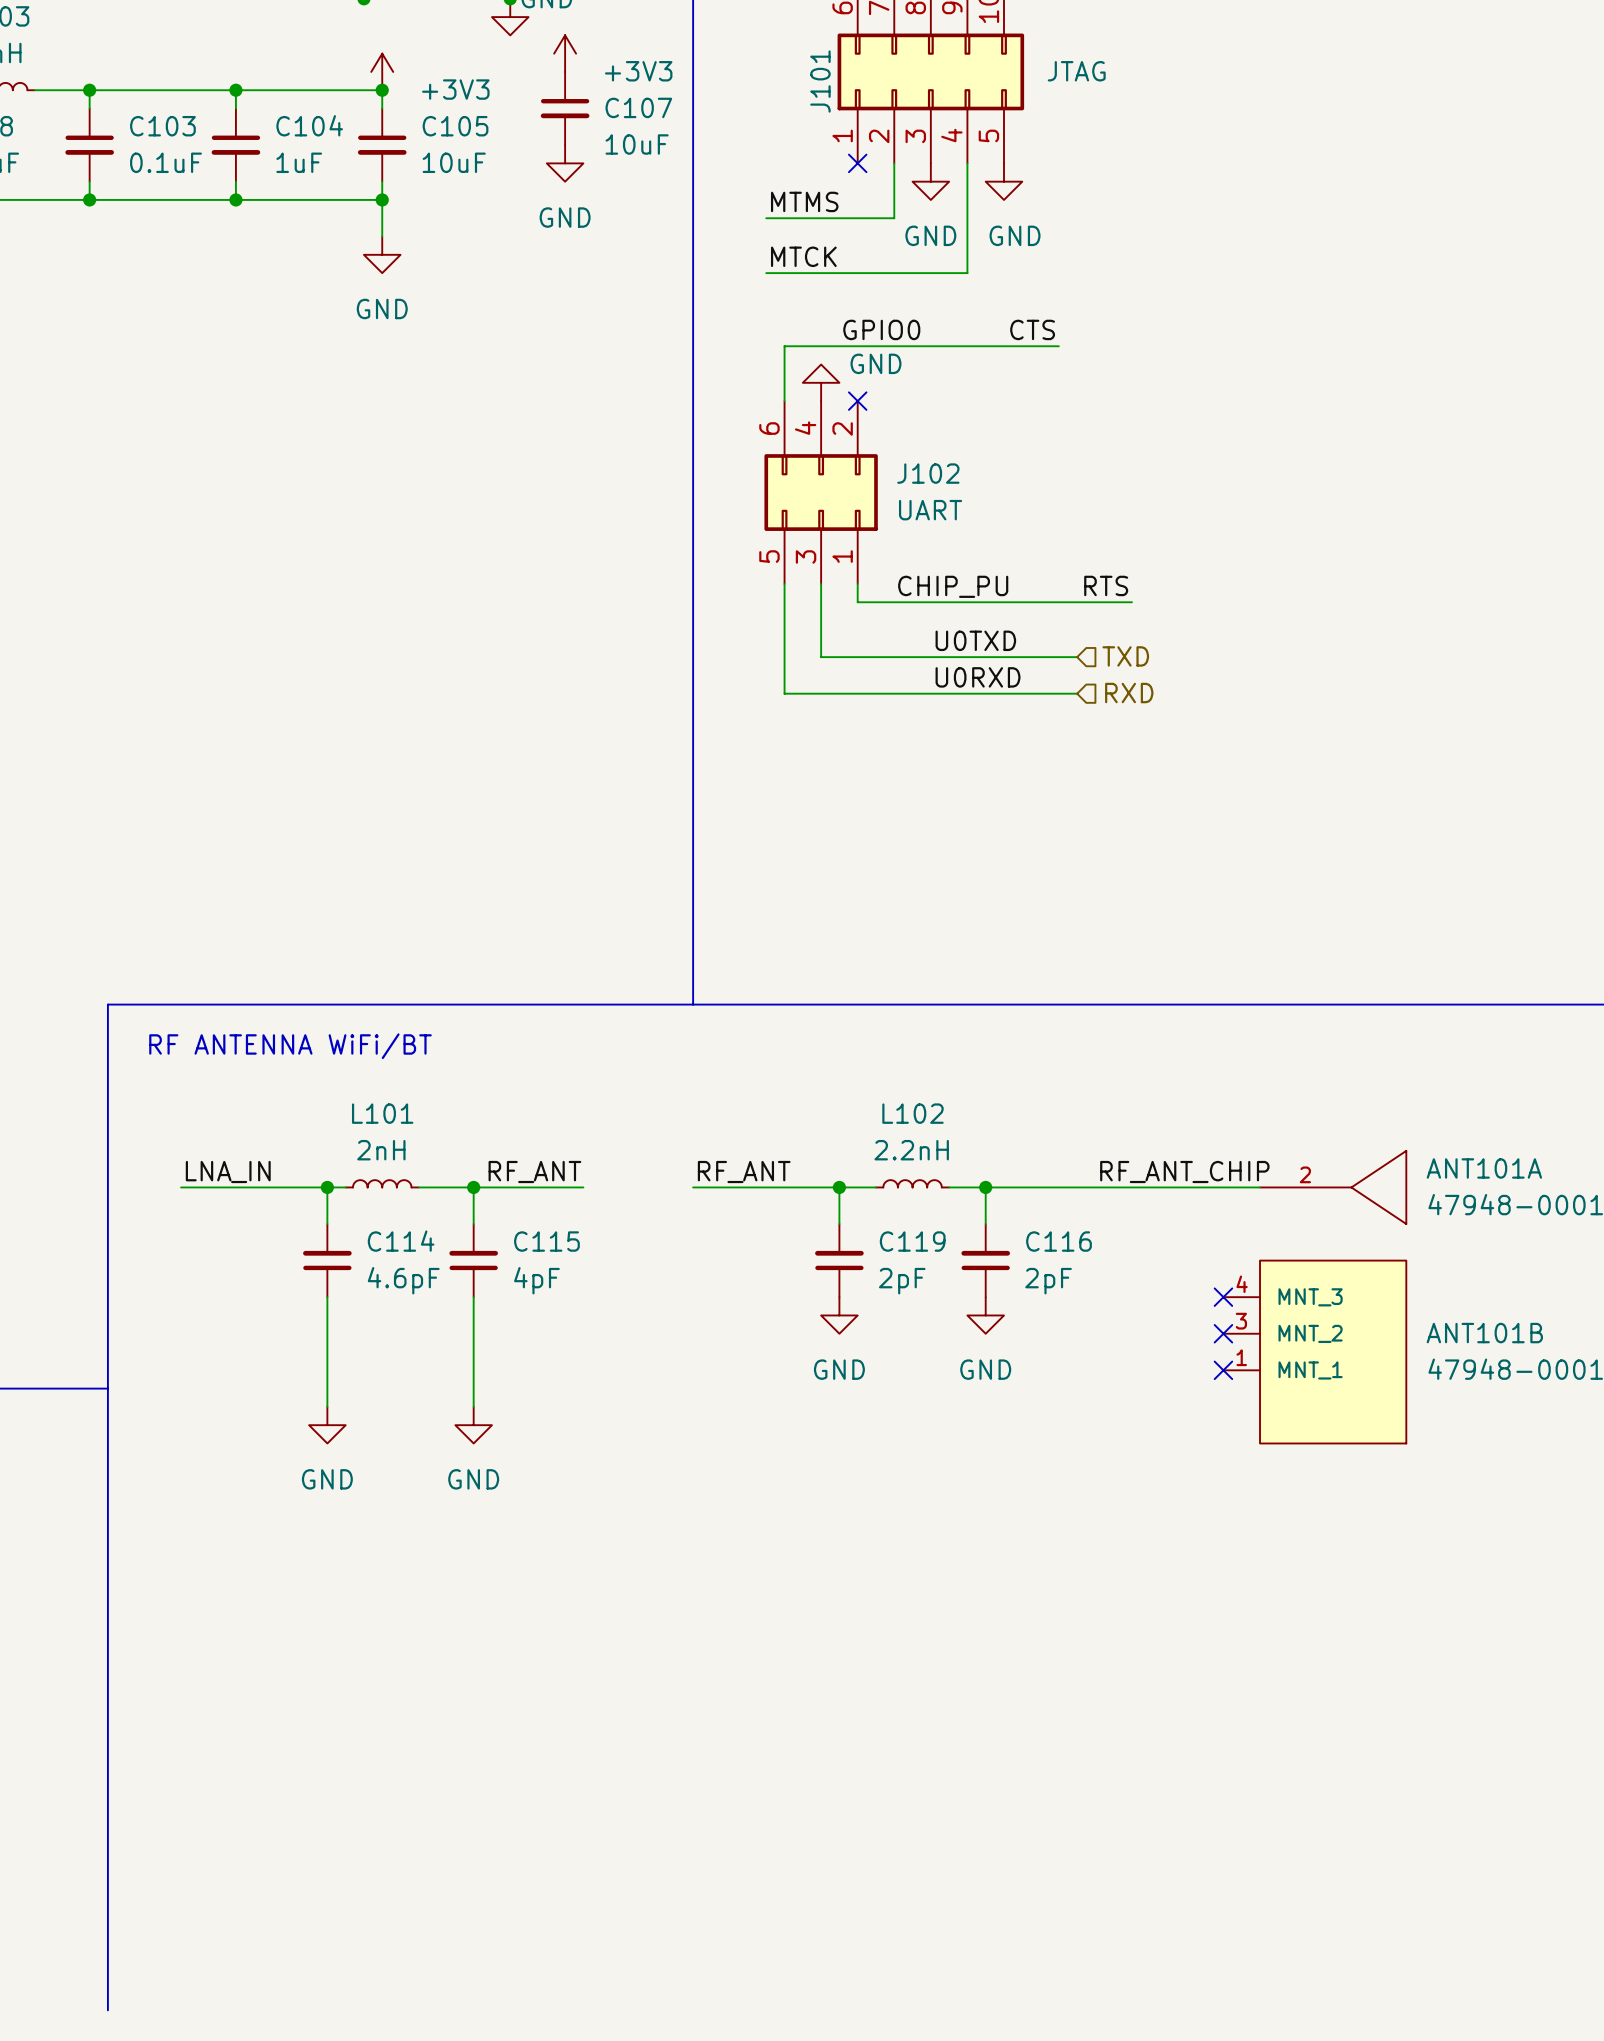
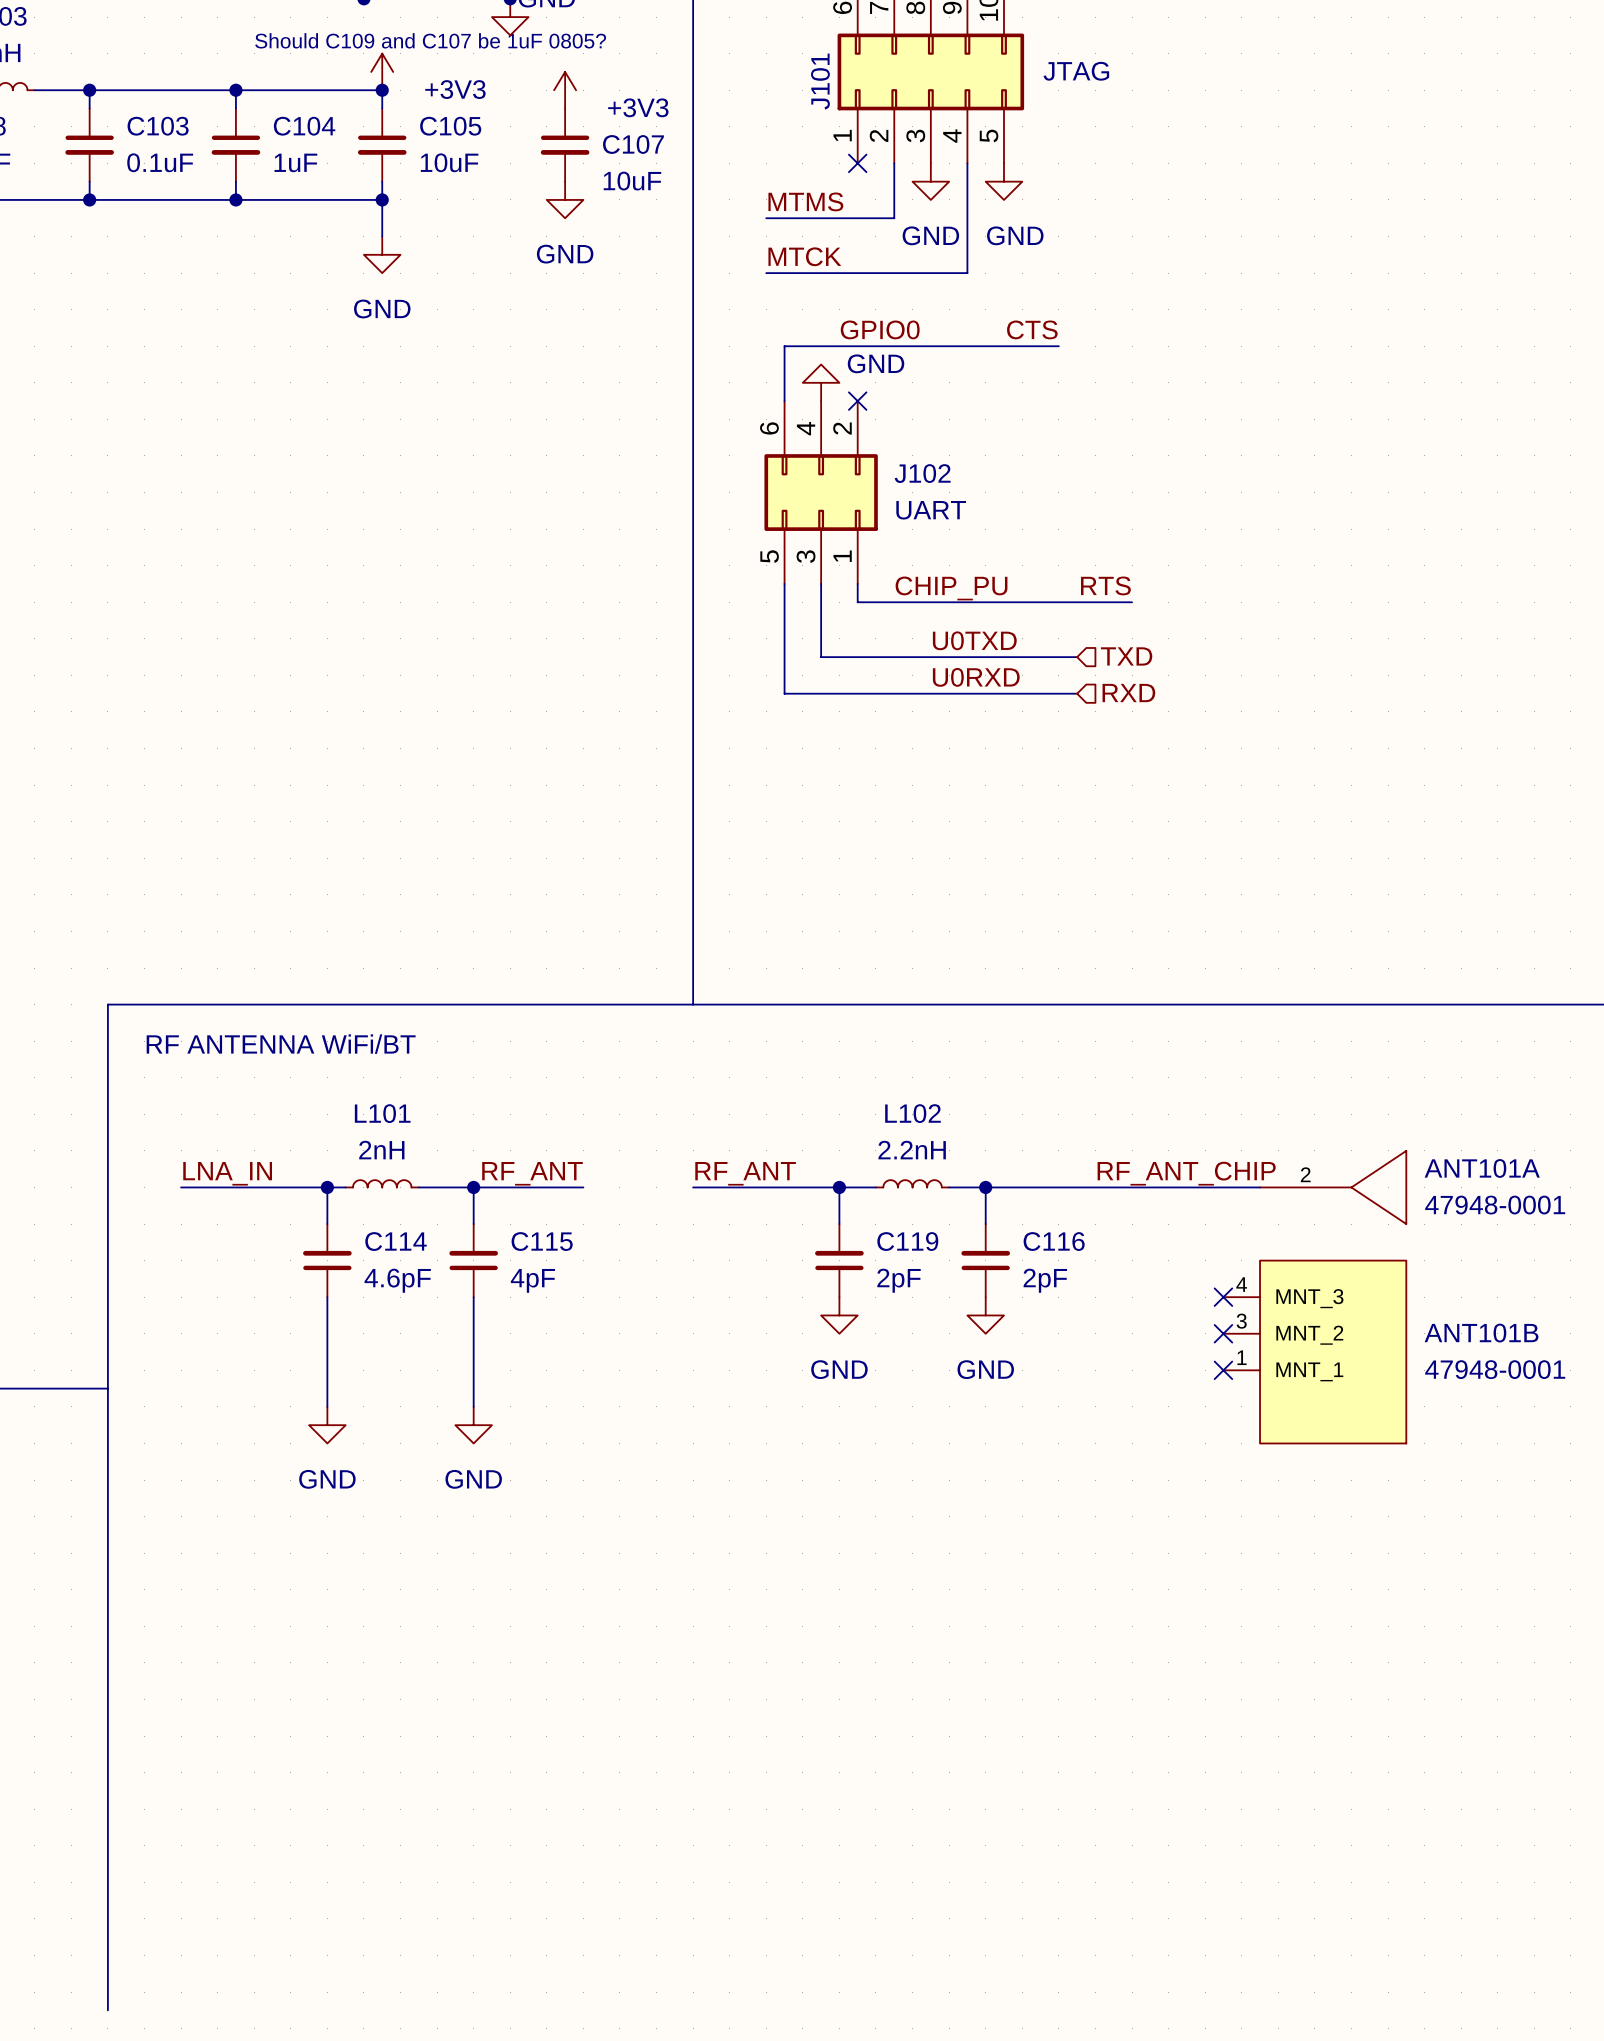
text: none -> Should C109 and C107 be 1uF 0805? (430, 40)
power symbol position: +3V3 (565, 53) -> +3V3 (565, 90)
C107 position: (565, 108) -> (565, 145)
power symbol position: GND (565, 163) -> GND (565, 199)

